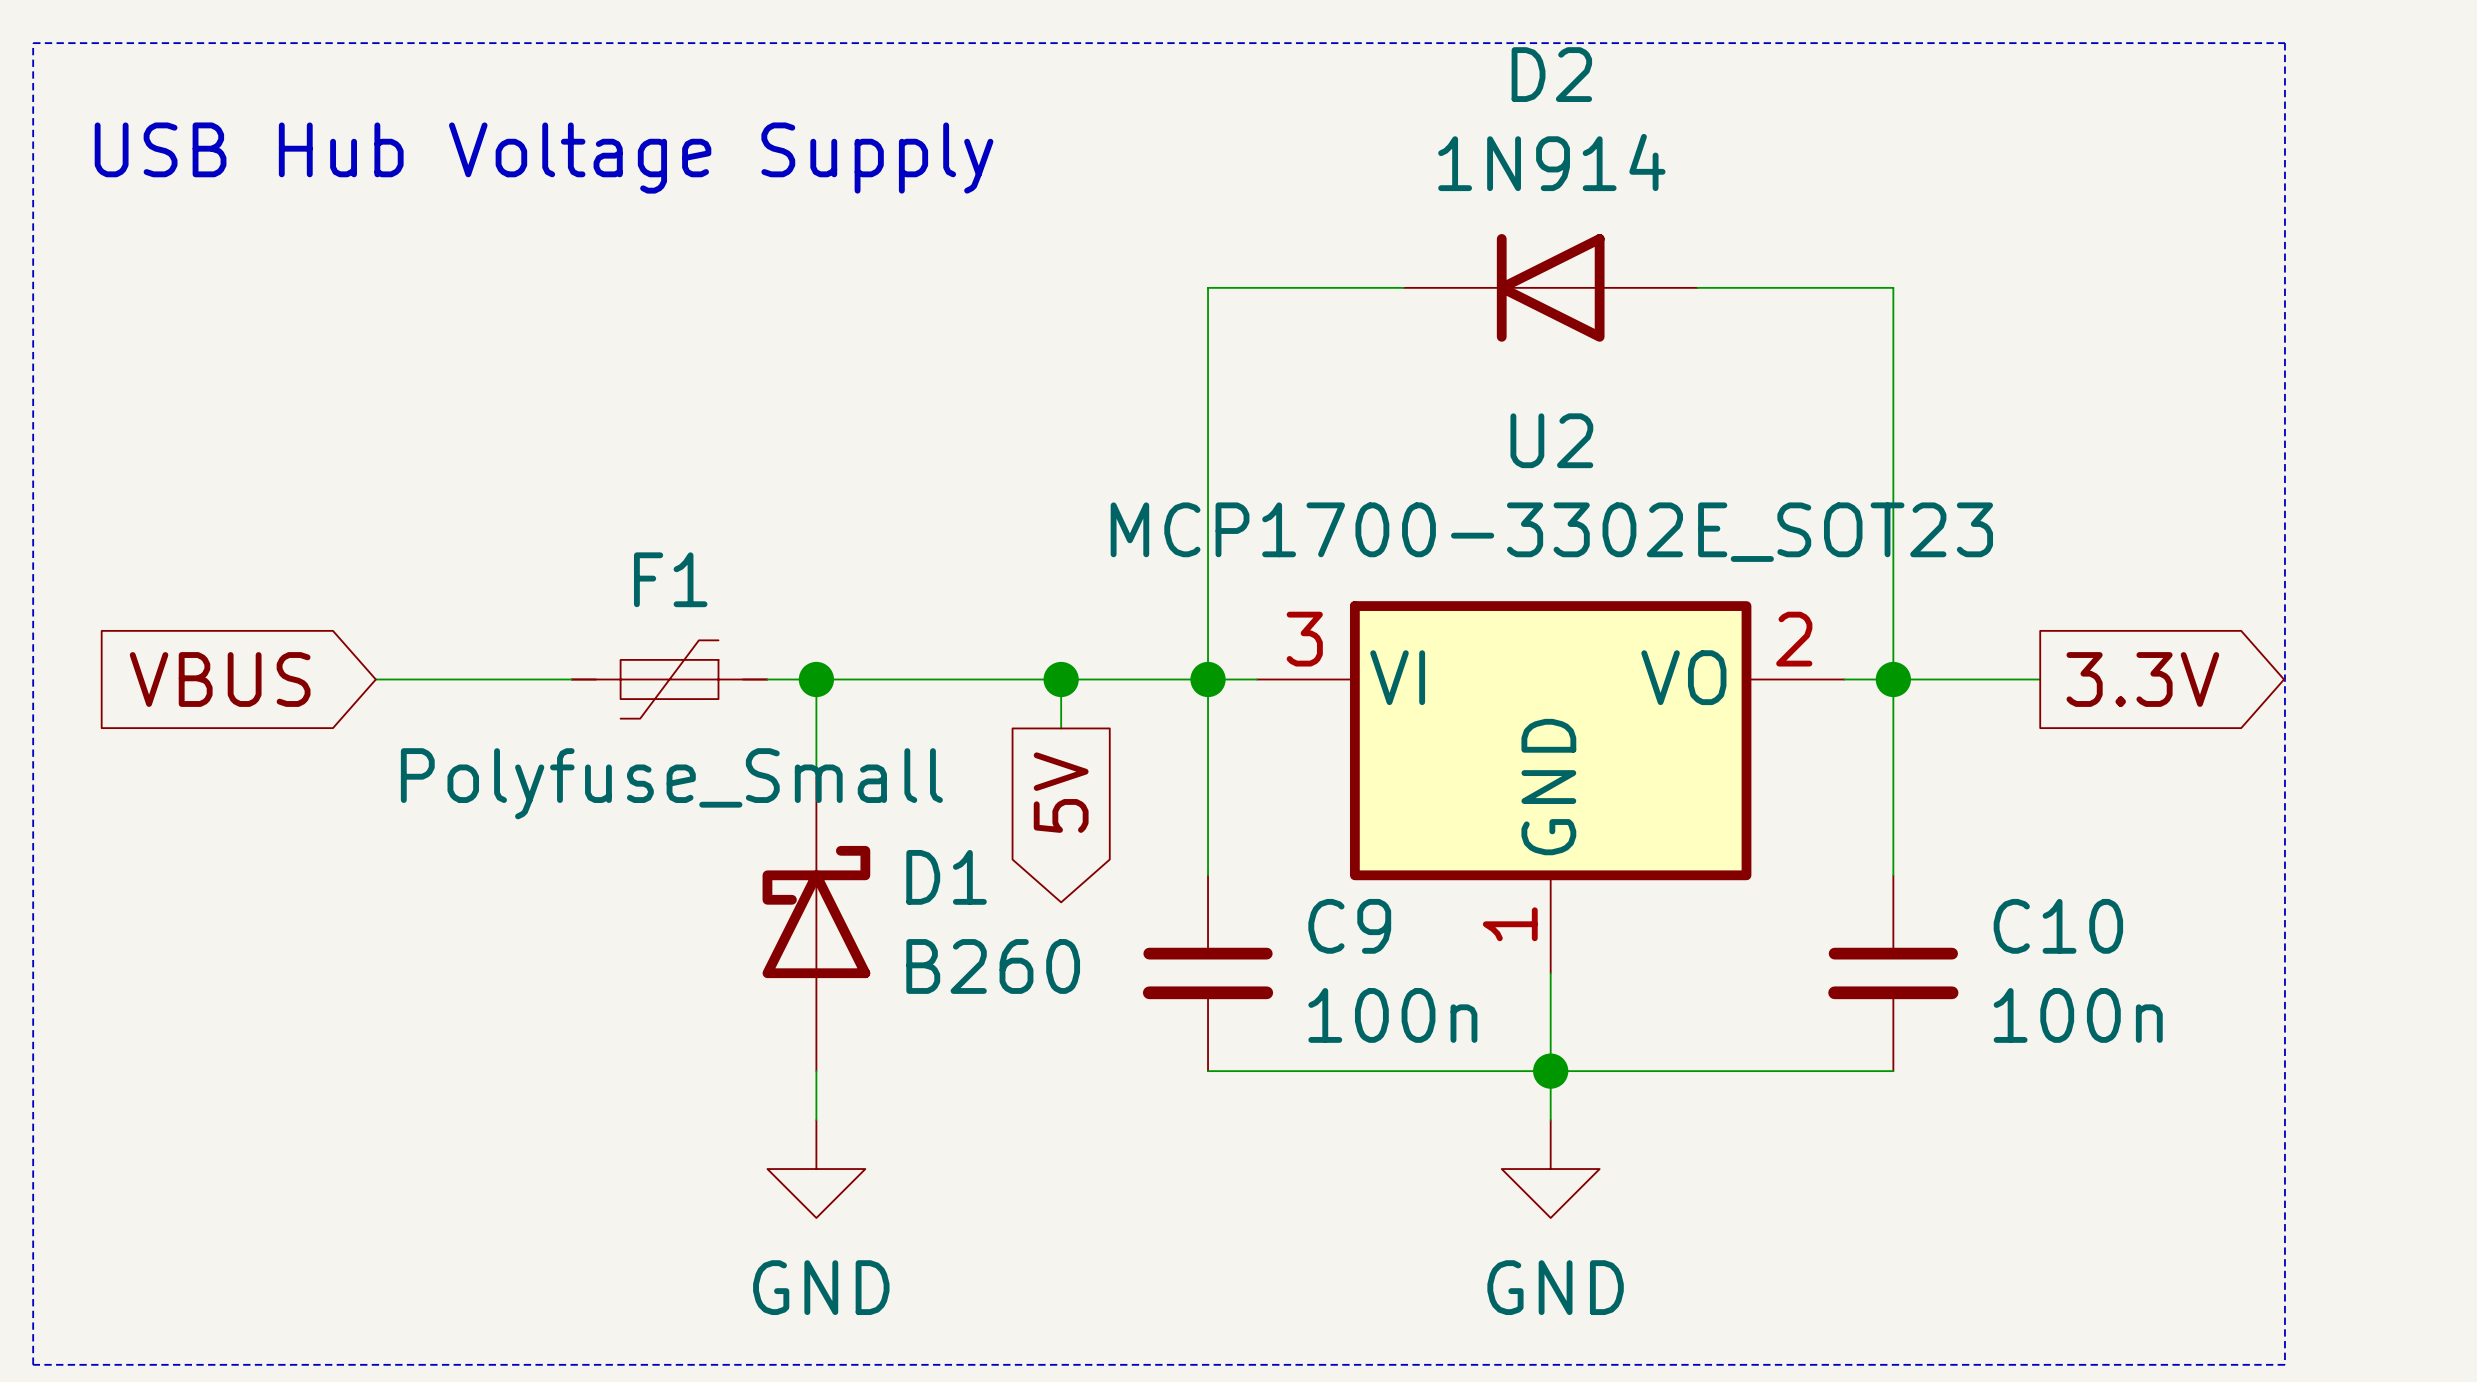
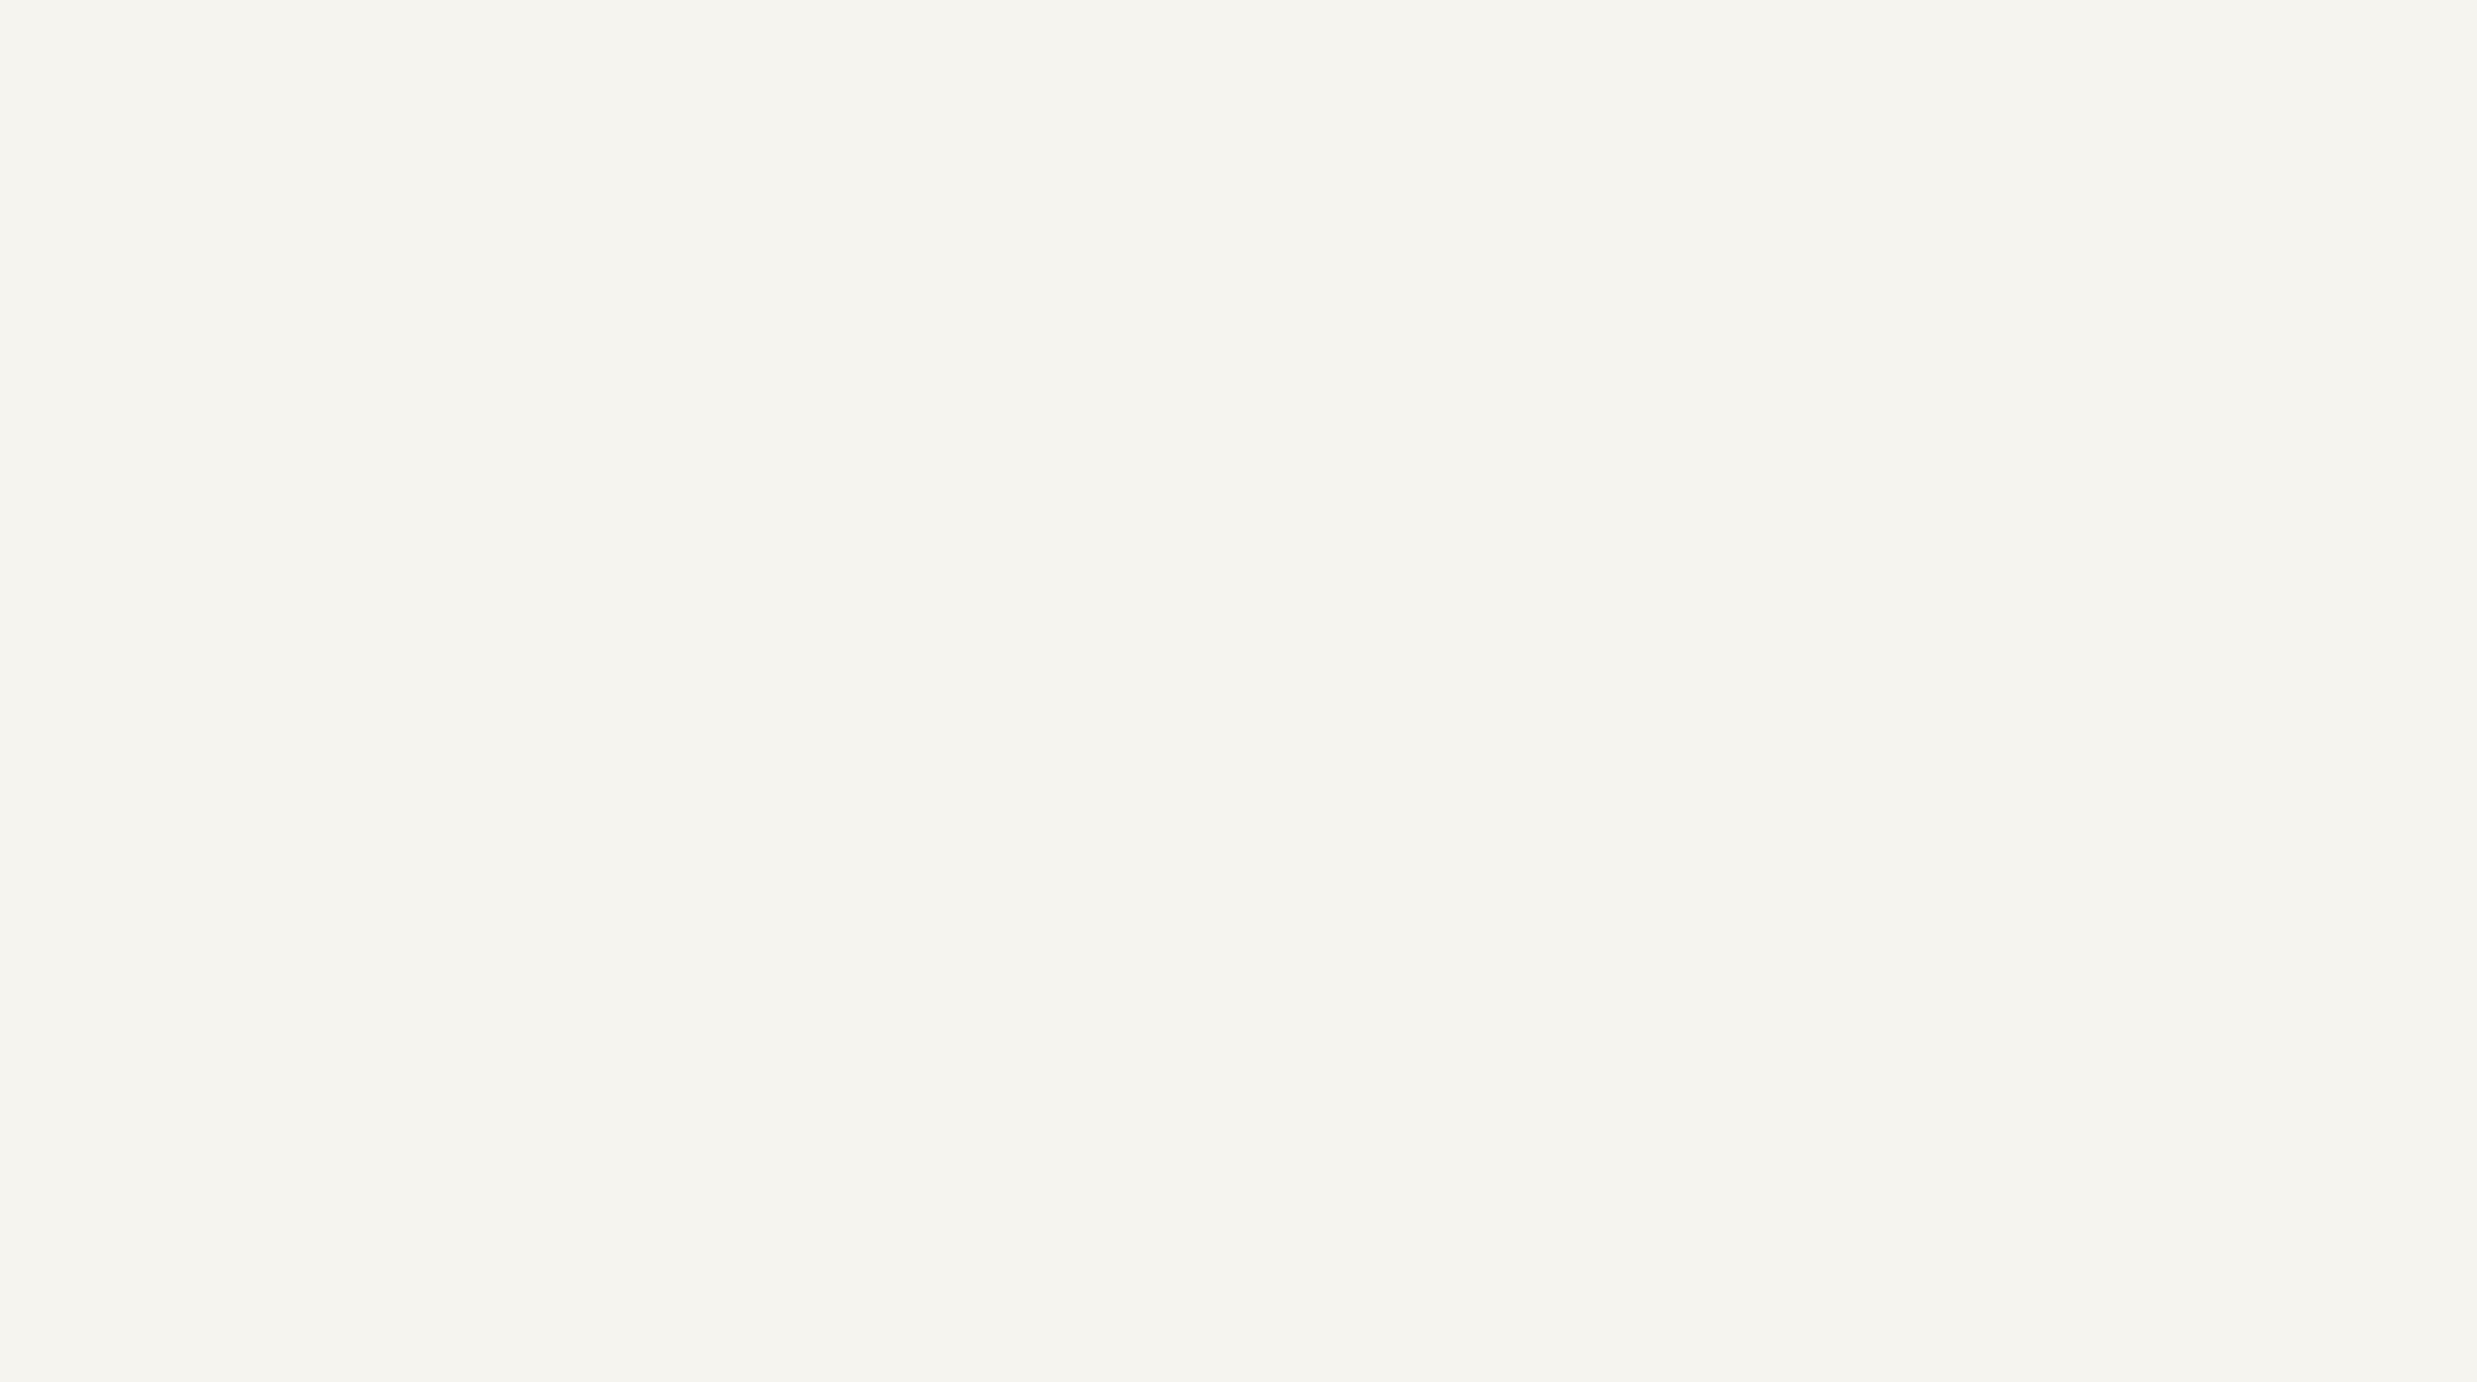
line: (33, 43) (33, 1364) (2284, 1364) (2284, 43) (33, 43) -> none
text: USB Hub Voltage Supply (544, 158) -> none
wire: (1403, 287) (1208, 287) (1208, 875) -> none
D2: 1N914 (1550, 287) -> none
wire: (1697, 287) (1893, 287) (1893, 875) -> none
global label: VBUS (220, 679) -> none
wire: (375, 679) (571, 679) -> none
F1: Polyfuse_Small (669, 679) -> none
wire: (767, 679) (1256, 679) -> none
wire: (816, 679) (816, 777) -> none
junction: (816, 679) -> none
wire: (1061, 679) (1061, 728) -> none
junction: (1061, 679) -> none
junction: (1208, 679) -> none
wire: (1844, 679) (2040, 679) -> none
junction: (1893, 679) -> none
global label: 3.3V (2142, 679) -> none
U2: MCP1700-3302E_SOT23 (1550, 787) -> none
global label: 5V (1061, 792) -> none
D1: B260 (816, 924) -> none
C9: 100n (1208, 973) -> none
wire: (1550, 973) (1550, 1120) -> none
C10: 100n (1893, 973) -> none
wire: (816, 1071) (816, 1120) -> none
wire: (1208, 1071) (1893, 1071) -> none
junction: (1550, 1071) -> none
power symbol: GND (816, 1169) -> none
power symbol: GND (1550, 1169) -> none

